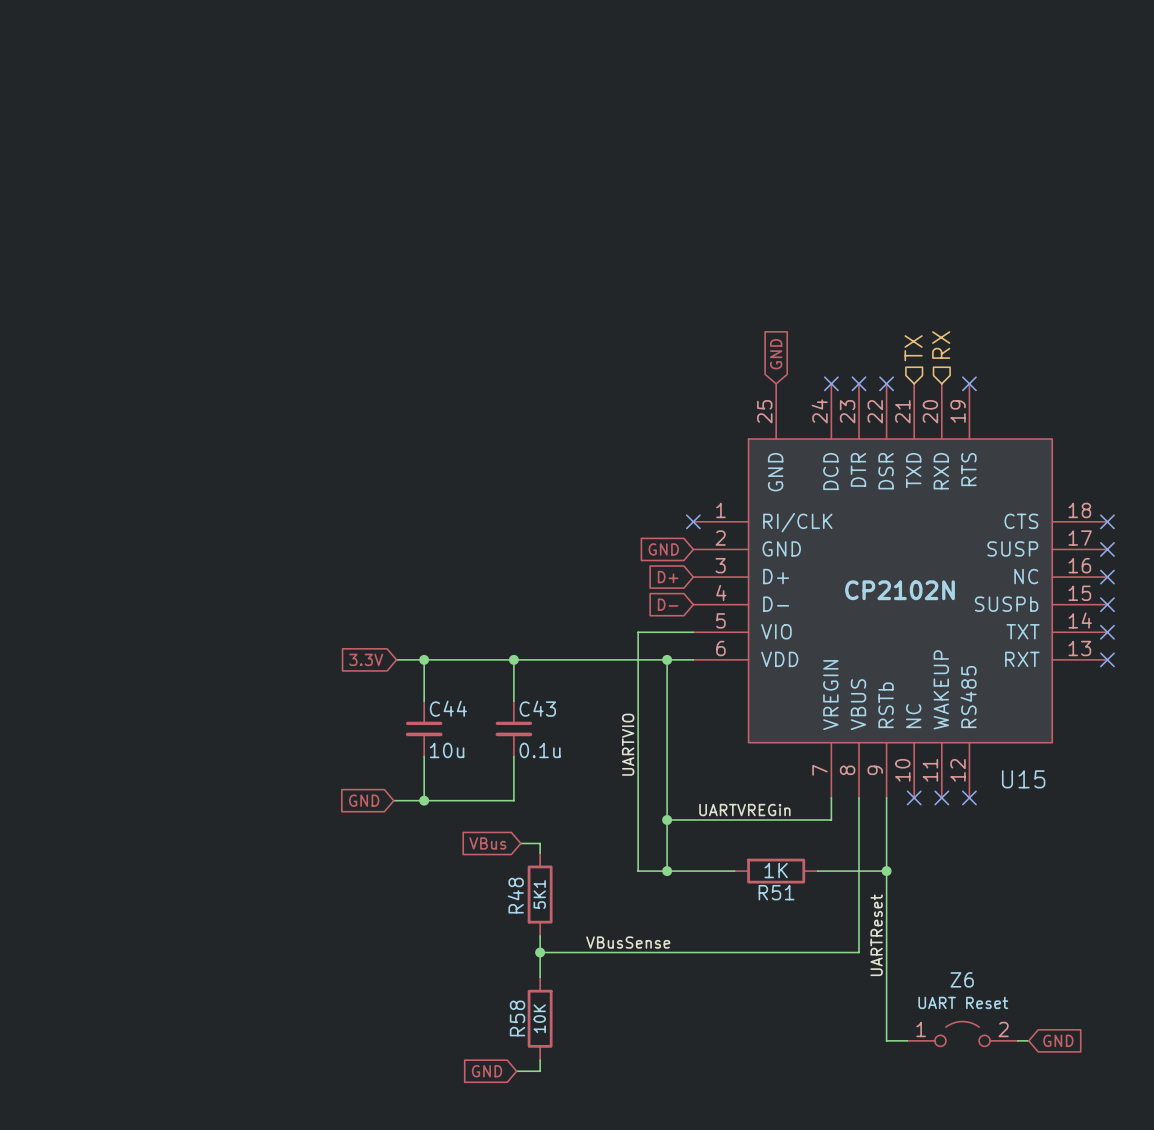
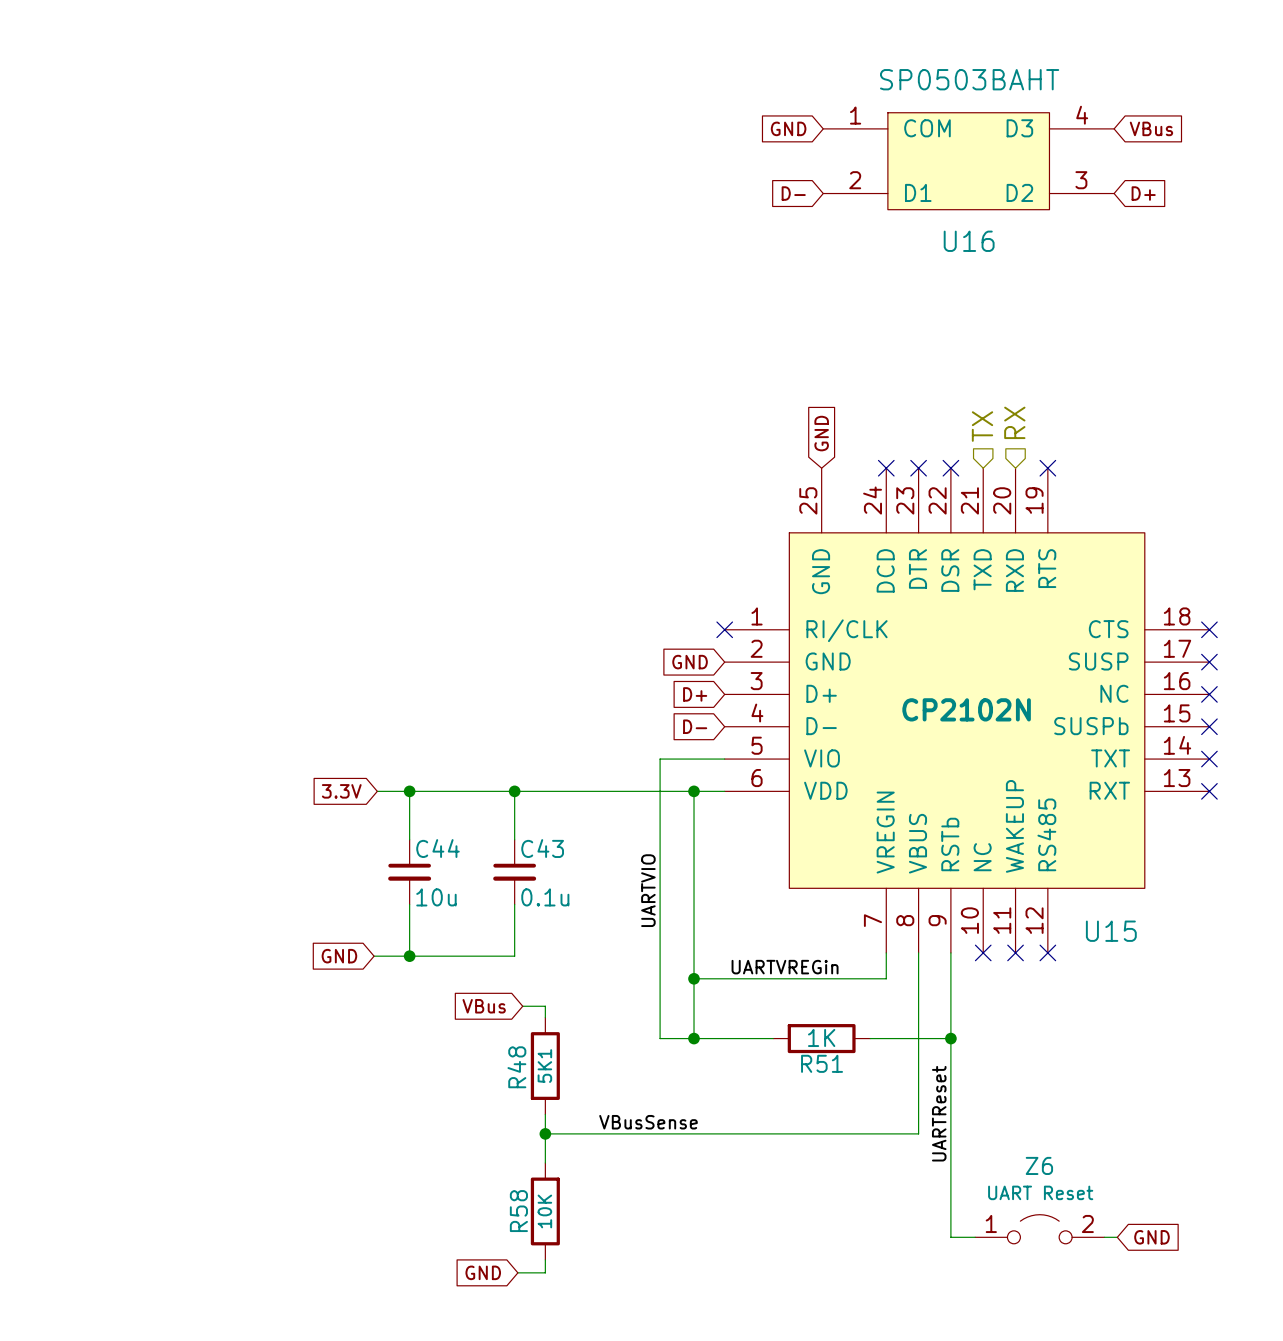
global label: none -> GND (788, 128)
global label: none -> VBus (1151, 128)
U16: none -> SP0503BAHT (968, 161)
global label: none -> D- (793, 193)
global label: none -> D+ (1143, 193)

